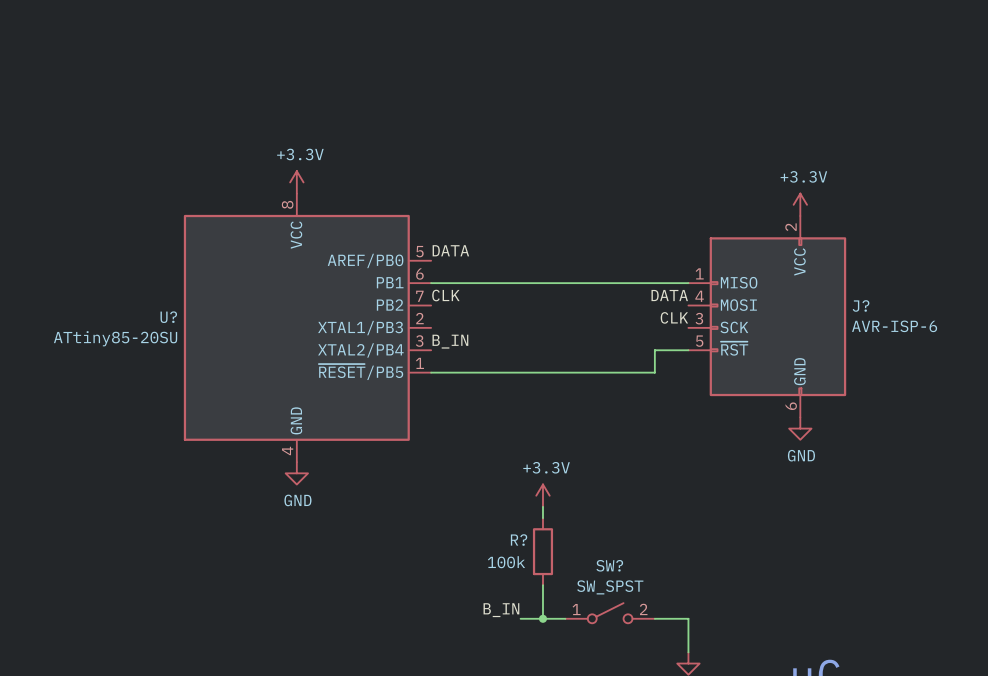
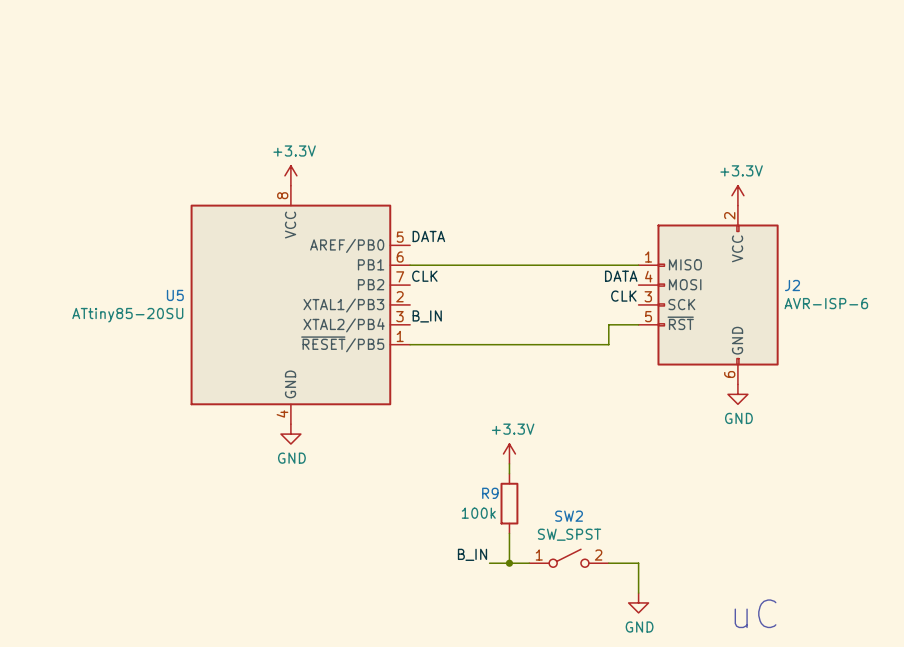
J? name: J? (861, 305) -> J2 (792, 285)
U? name: U? (168, 317) -> U5 (175, 295)
R? name: R? (519, 540) -> R9 (490, 493)
SW? name: SW? (609, 565) -> SW2 (569, 516)

